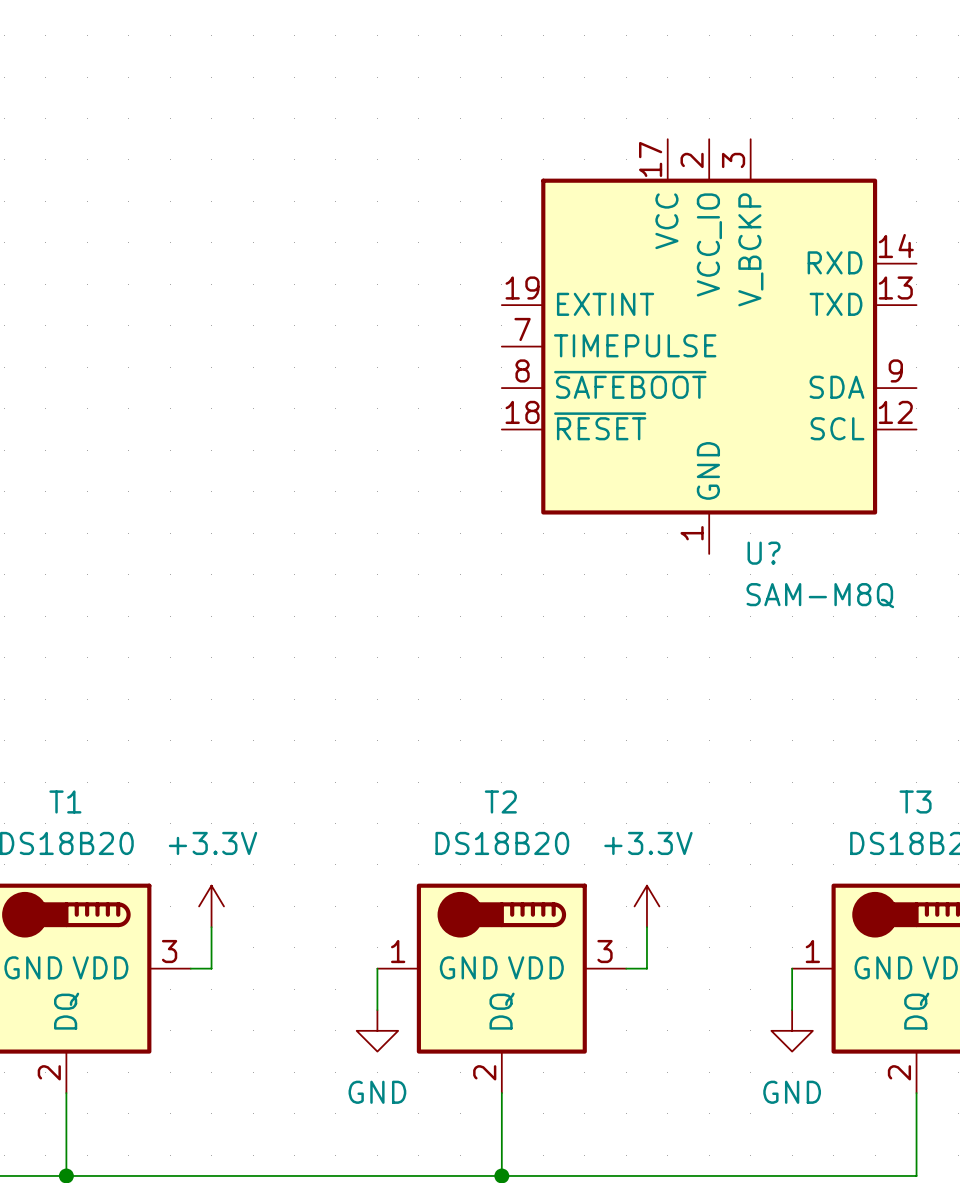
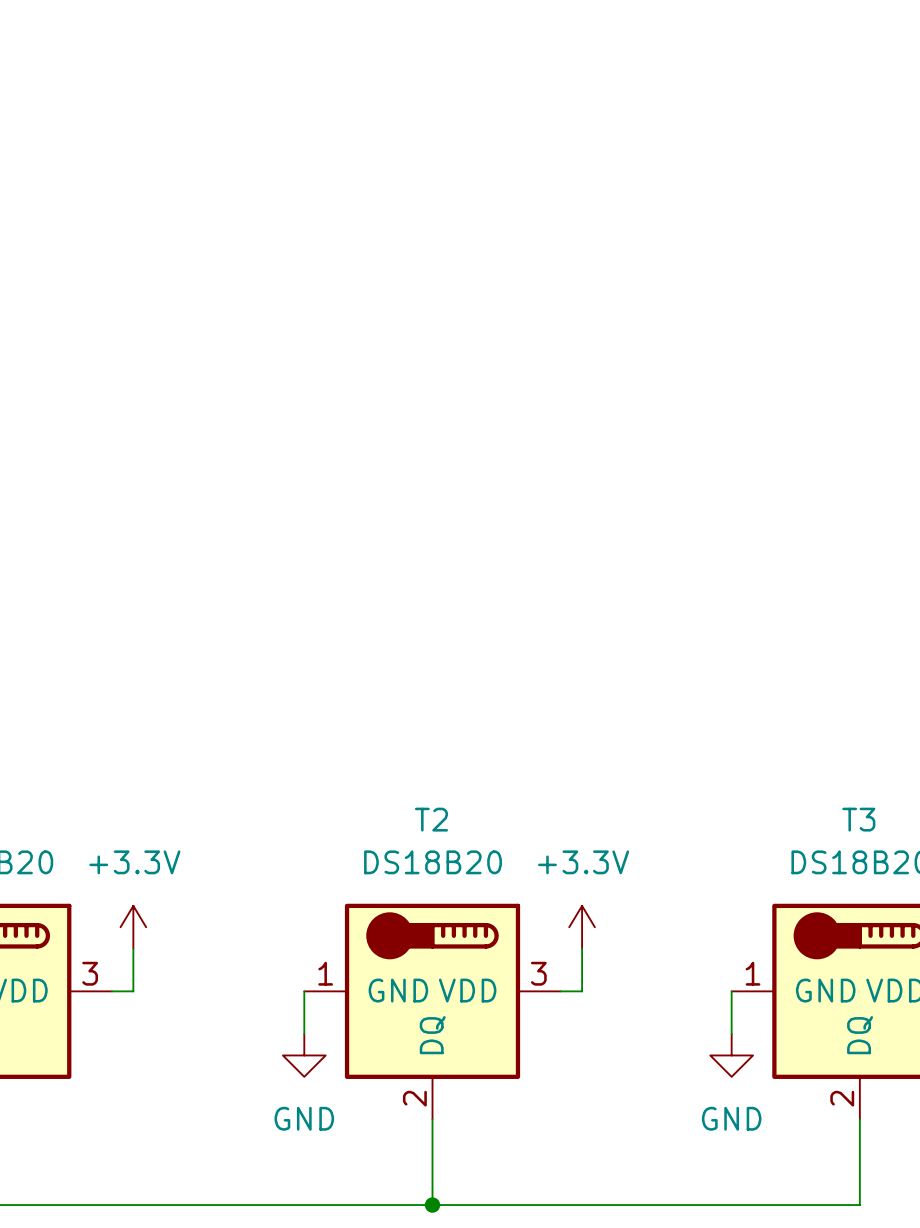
U?: SAM-M8Q (709, 346) -> none

